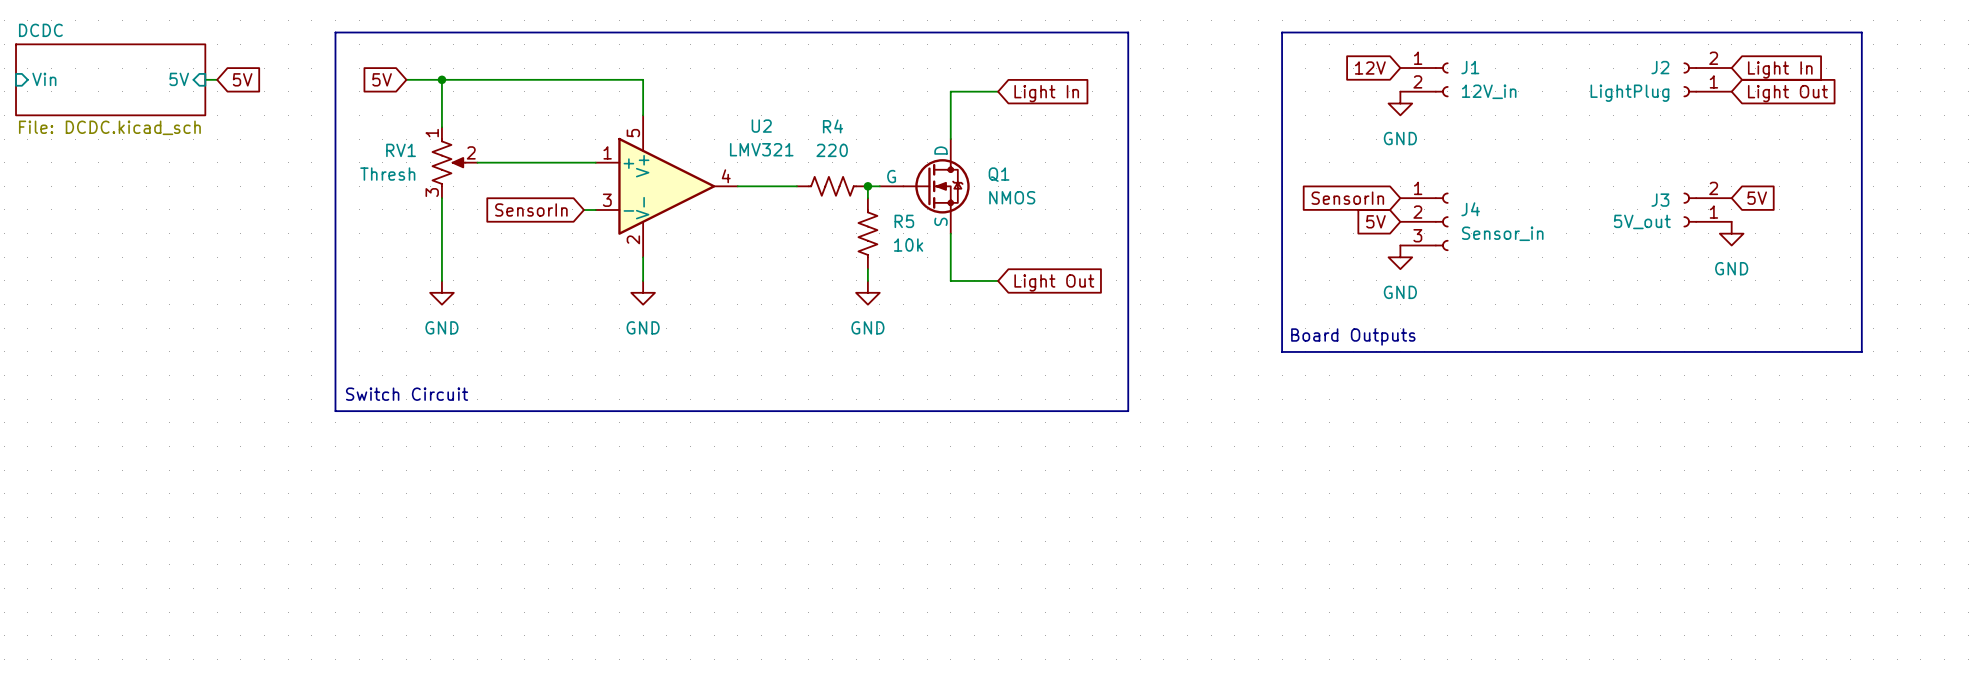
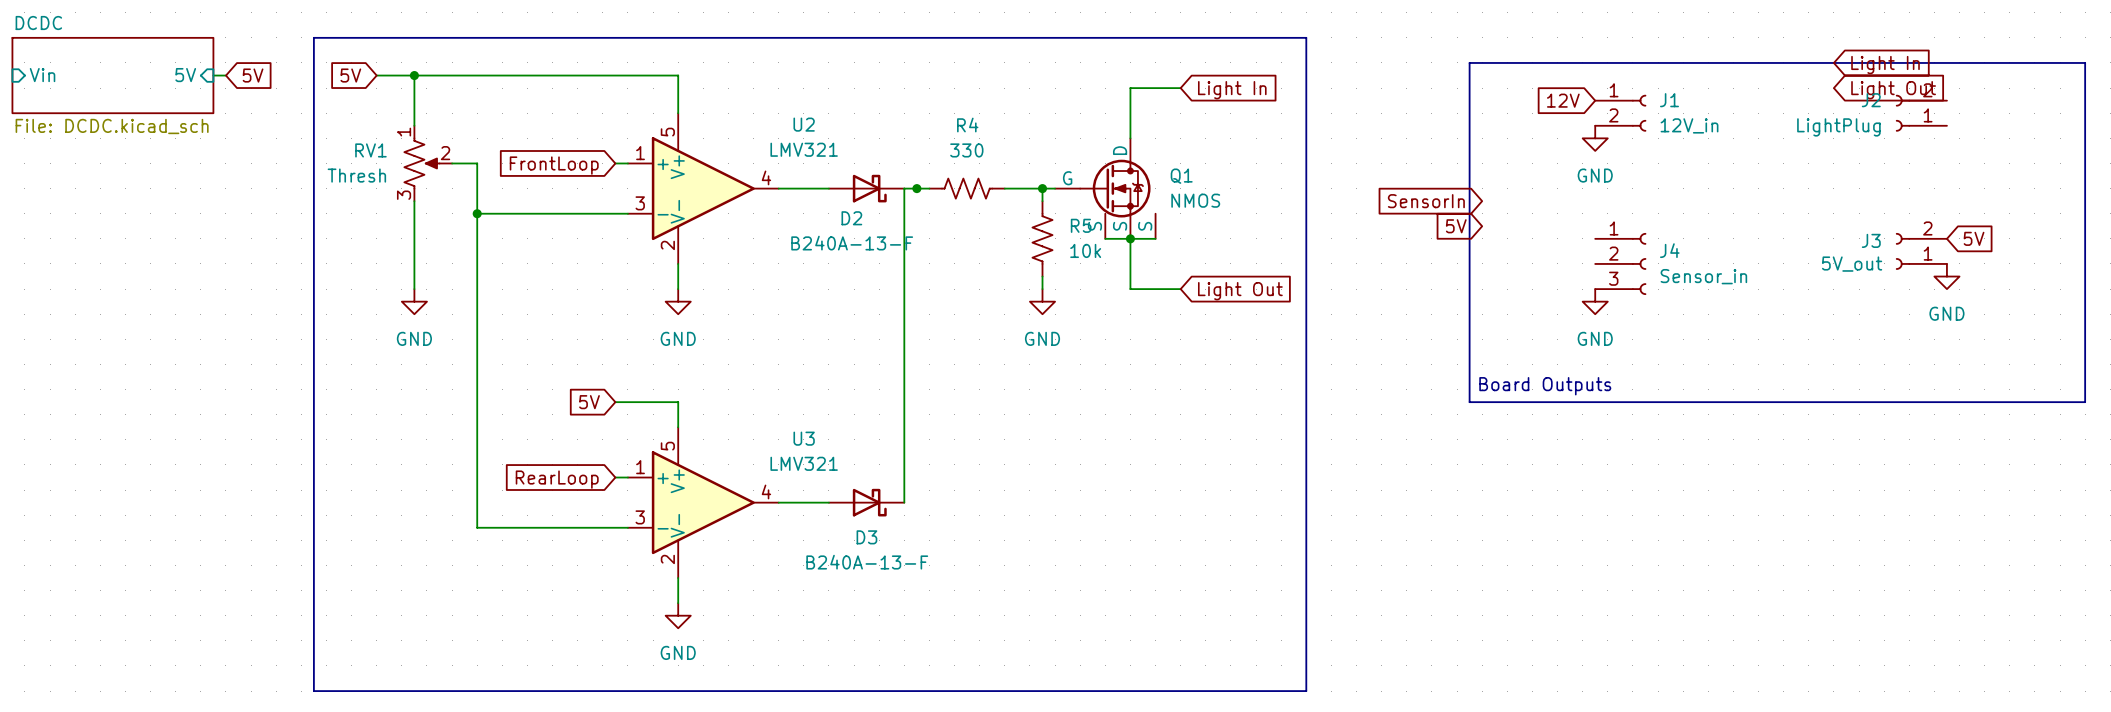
line: (335, 32) (1128, 32) (1128, 411) (335, 411) (335, 32) -> none
line: (1282, 32) (1861, 32) (1861, 351) (1282, 351) (1282, 32) -> (1469, 62) (2085, 62) (2085, 402) (1469, 402) (1469, 62)
line: none -> (313, 37) (1306, 37) (1306, 691) (313, 691) (313, 37)
global label position: 12V (1370, 68) -> 12V (1563, 100)
wire: none -> (376, 75) (426, 75)
global label position: 5V (382, 79) -> 5V (350, 75)
wire: (441, 79) (441, 127) -> (414, 75) (414, 125)
junction position: (441, 79) -> (414, 75)
J1 position: (1424, 79) -> (1620, 113)
J2 position: (1707, 79) -> (1921, 113)
wire: (998, 91) (950, 91) (950, 139) -> (1180, 88) (1130, 88) (1130, 138)
global label position: Light In (1046, 93) -> Light In (1232, 90)
power symbol: GND (1400, 103) -> none
Q1 symbol: [879, 139, 970, 234] -> [1055, 138, 1156, 239]
power symbol: none -> GND (1595, 138)
R4 value: 220 (832, 150) -> 330 (966, 150)
wire: none -> (452, 163) (477, 163) (477, 527) (627, 527)
RV1 position: (454, 162) -> (428, 163)
wire: (477, 162) (583, 162) -> none
global label: none -> FrontLoop (554, 165)
D2: none -> B240A-13-F (866, 188)
R4 position: (832, 186) -> (967, 188)
wire: (867, 186) (867, 198) -> (916, 188) (904, 188) (904, 502)
wire: none -> (1004, 188) (1055, 188)
wire: none -> (1042, 188) (1042, 201)
junction: none -> (1042, 188)
wire: (441, 198) (441, 280) -> (414, 201) (414, 289)
global label position: 5V (1757, 198) -> 5V (1974, 238)
wire: none -> (477, 213) (615, 213)
junction: none -> (477, 213)
global label: SensorIn (531, 209) -> none
J3 position: (1707, 209) -> (1921, 251)
J4 position: (1424, 221) -> (1620, 263)
R5 position: (867, 233) -> (1042, 238)
wire: (950, 233) (950, 280) (998, 280) -> (1130, 238) (1130, 289) (1180, 289)
wire: none -> (1105, 238) (1155, 238)
junction: none -> (1130, 238)
power symbol position: GND (1731, 233) -> GND (1946, 276)
power symbol: GND (1400, 257) -> none
wire: (867, 269) (867, 280) -> (1042, 276) (1042, 289)
global label position: Light Out (1054, 282) -> Light Out (1240, 291)
power symbol position: GND (441, 292) -> GND (414, 301)
power symbol position: GND (867, 292) -> GND (1042, 301)
power symbol: none -> GND (1595, 301)
text position: Board Outputs (1353, 336) -> Board Outputs (1545, 386)
global label: none -> 5V (589, 402)
wire: none -> (615, 402) (678, 402) (678, 427)
text: Switch Circuit (407, 394) -> none
wire: none -> (615, 477) (627, 477)
global label: none -> RearLoop (557, 479)
U3: none -> LMV321 (703, 502)
wire: none -> (778, 502) (828, 502)
D3: none -> B240A-13-F (866, 502)
wire: none -> (678, 578) (678, 603)
power symbol: none -> GND (678, 615)

